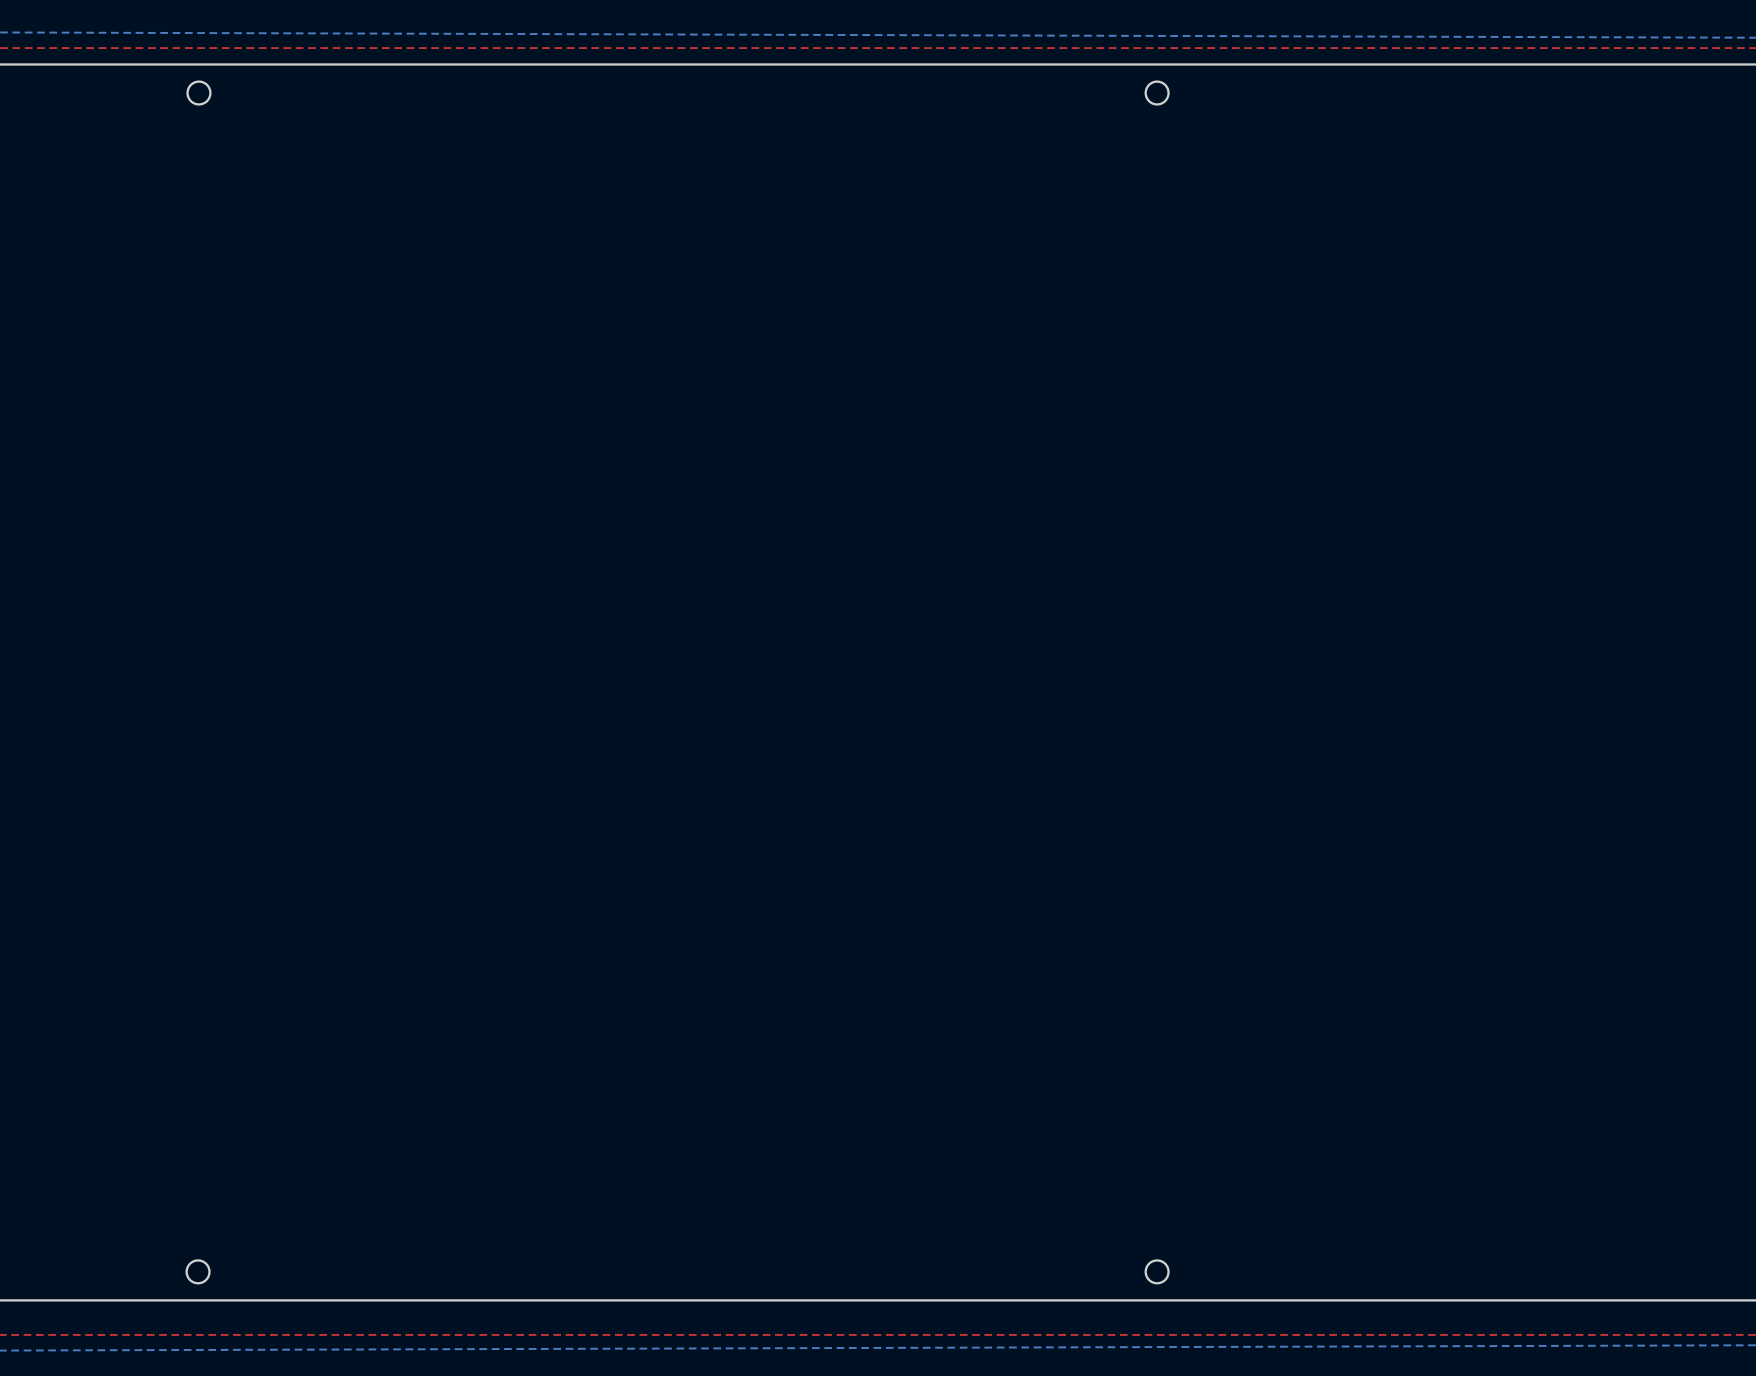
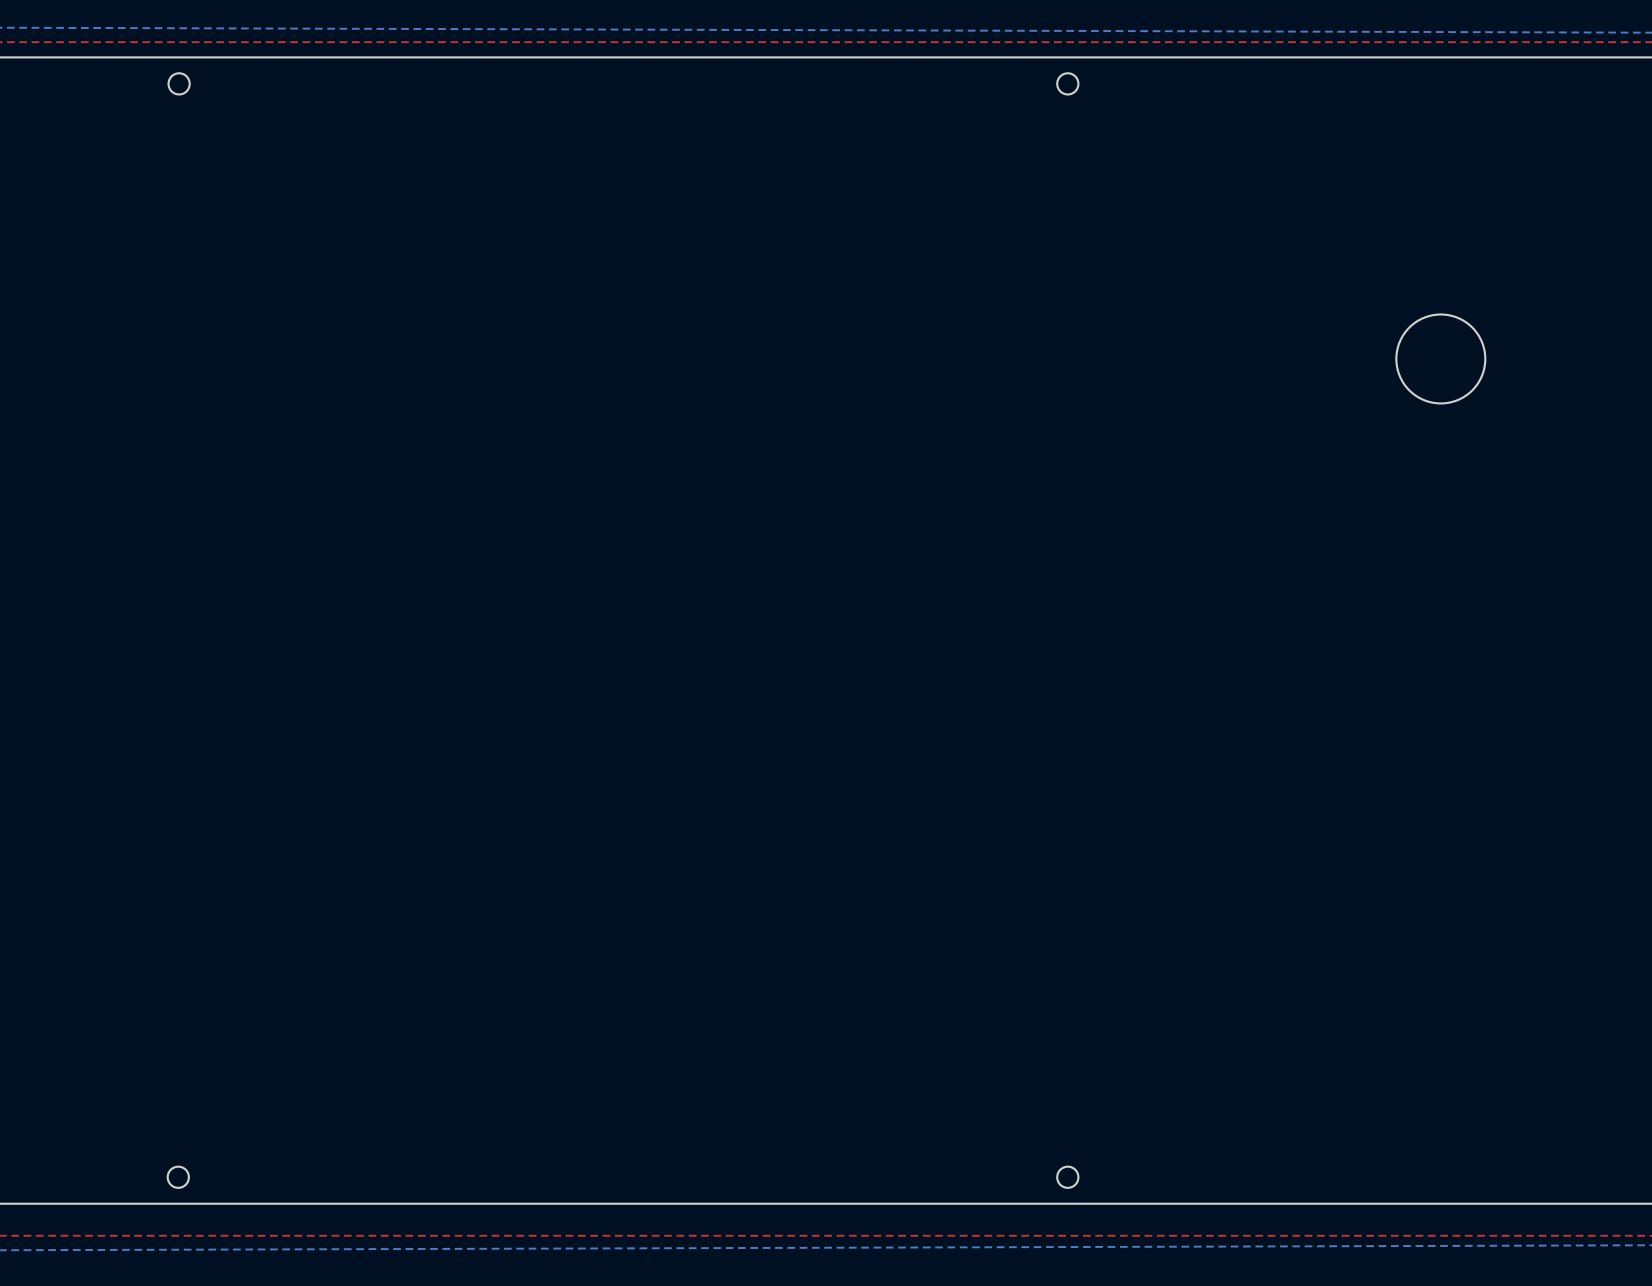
round board edge: none -> [1395, 313, 1487, 405]

